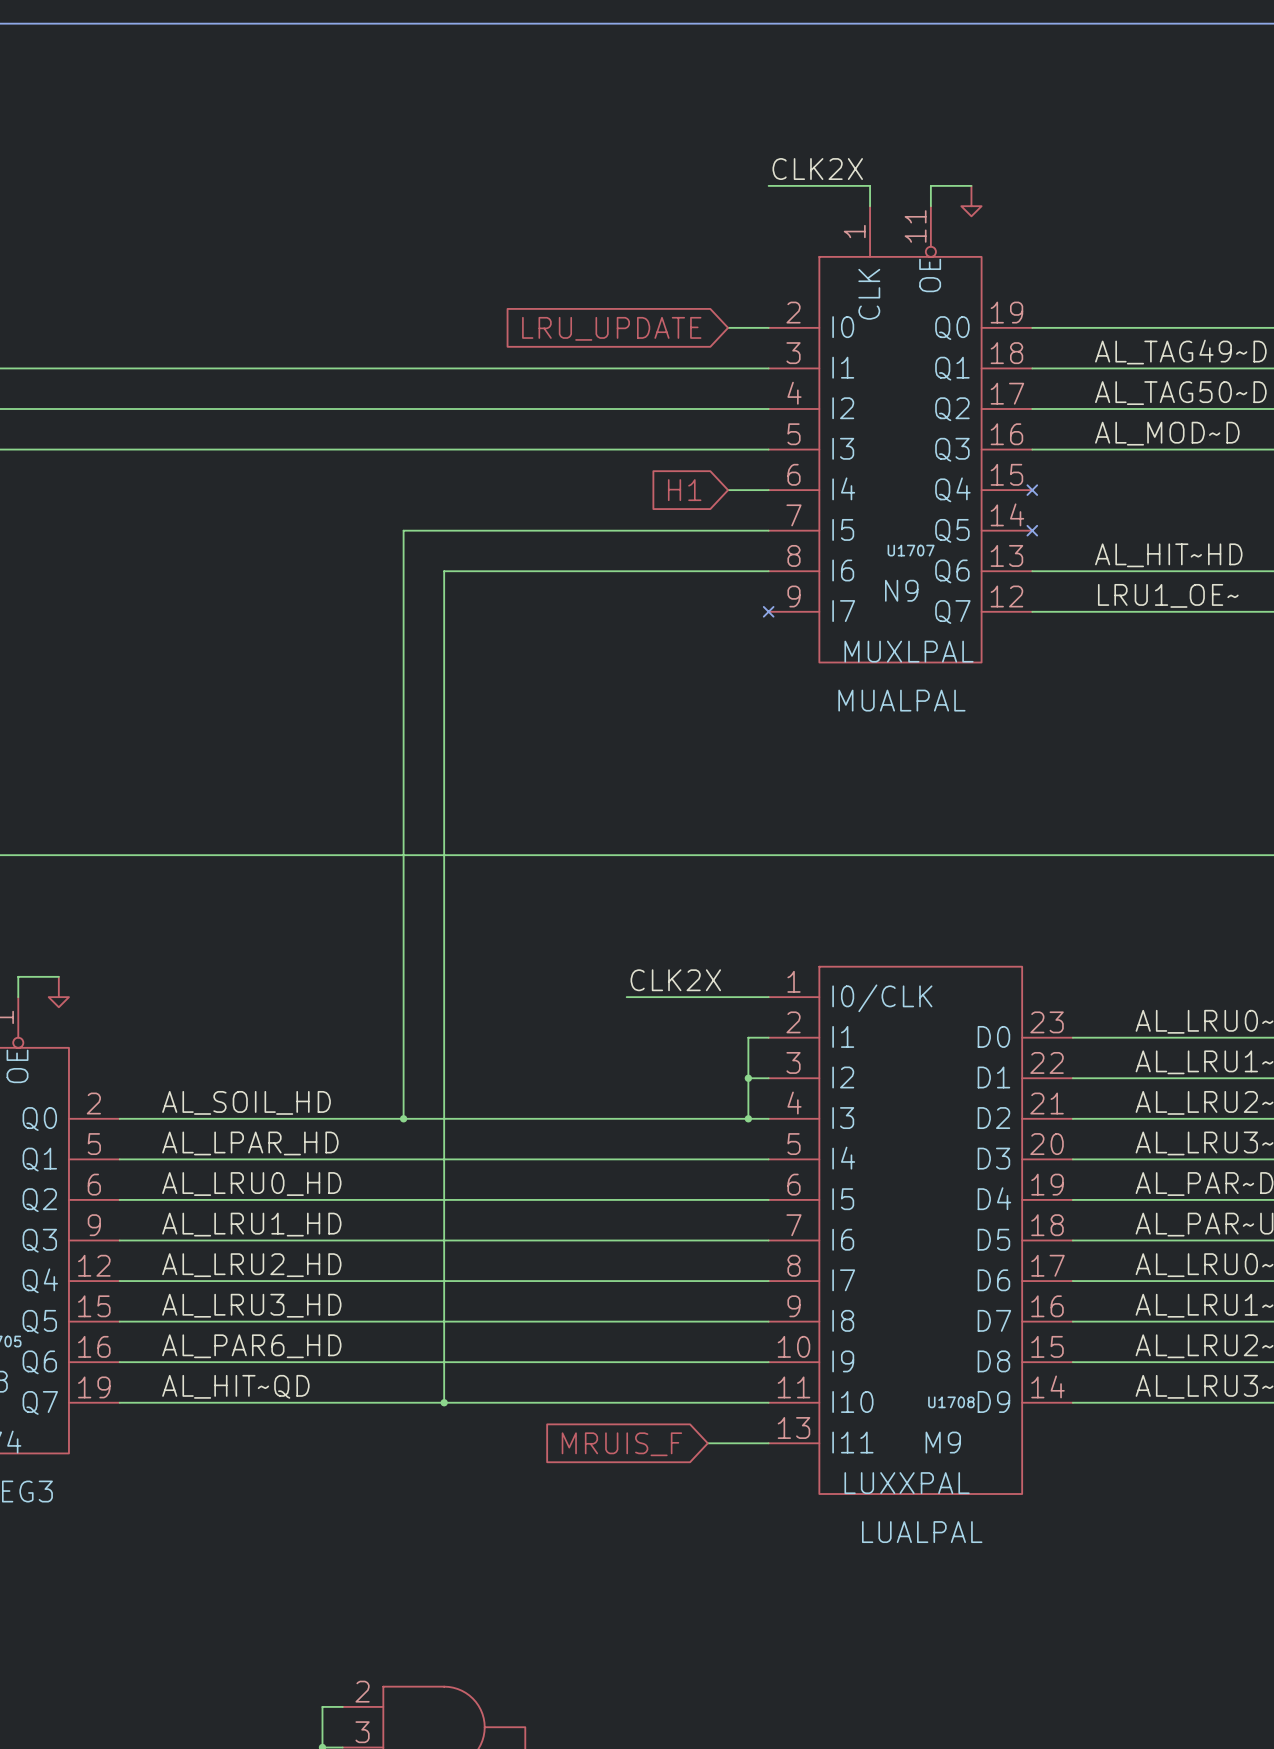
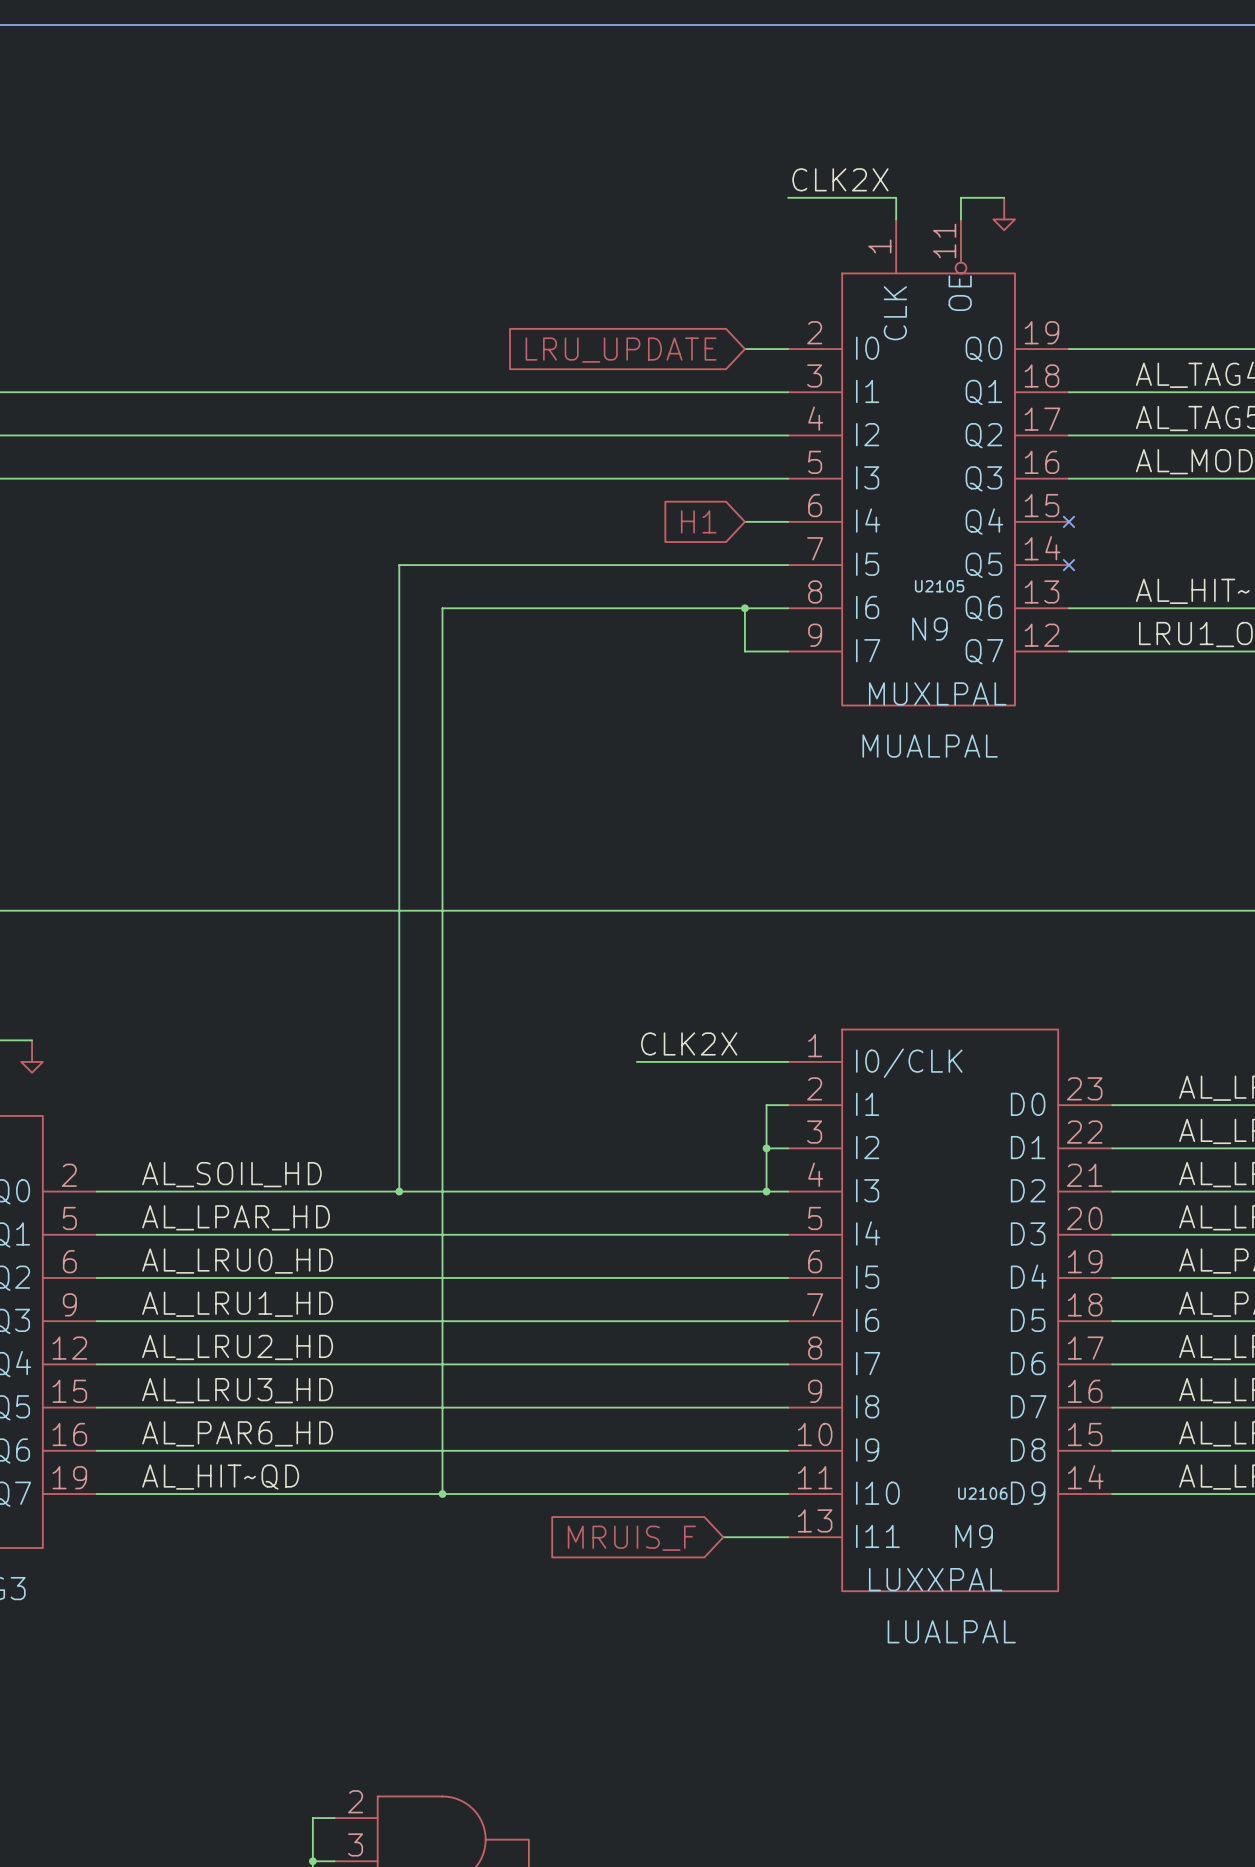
U1707 name: U1707 (911, 550) -> U2105 (939, 586)
wire: none -> (744, 608) (744, 651) (788, 651)
junction: none -> (744, 608)
no-connect mark: (768, 611) -> none
U1708 name: U1708 (951, 1402) -> U2106 (982, 1493)

